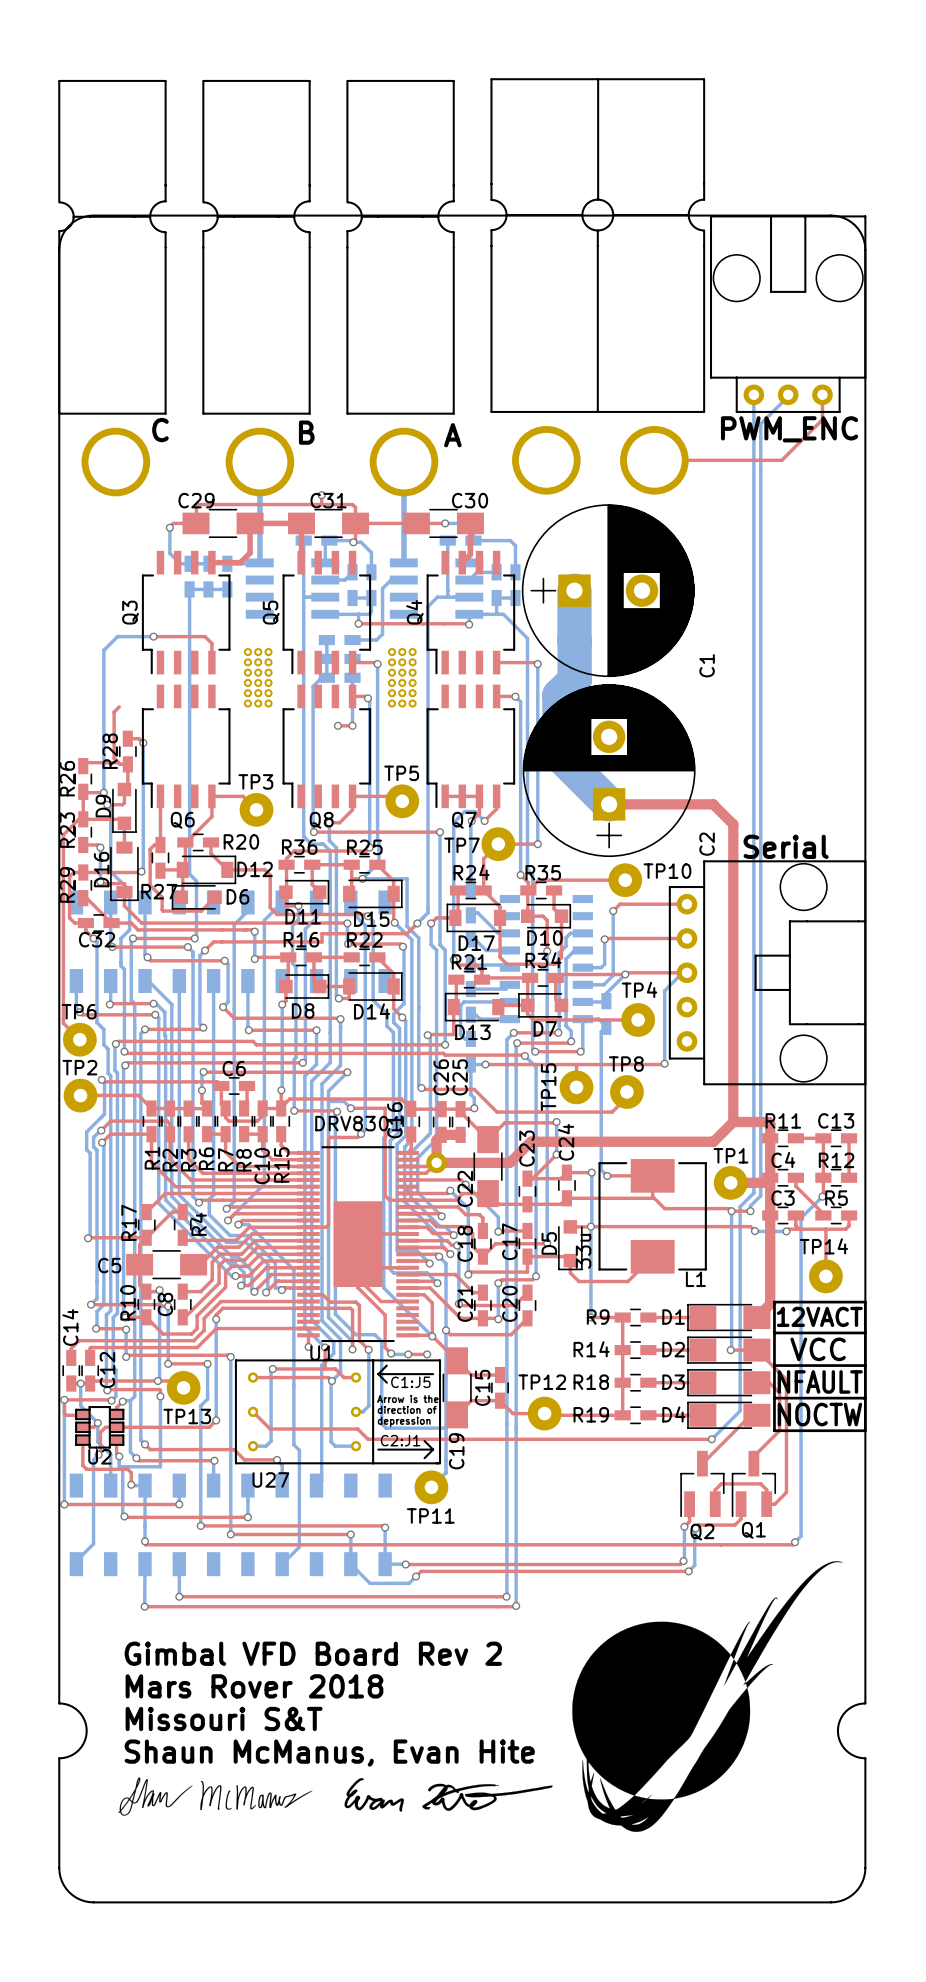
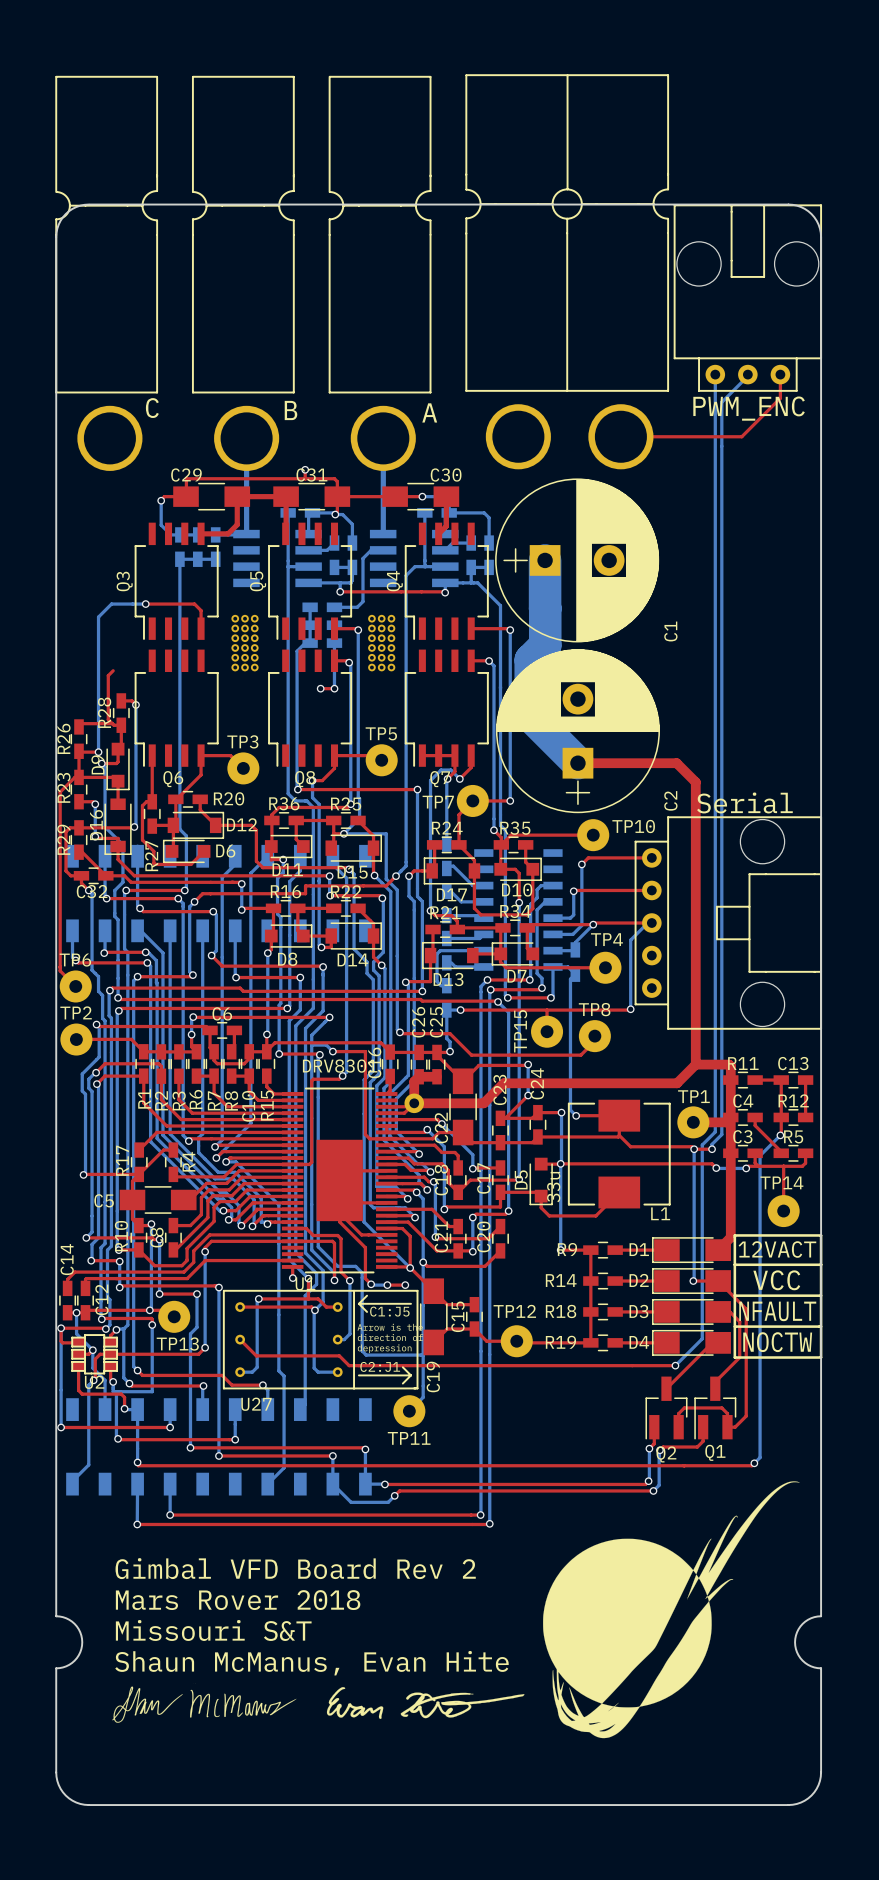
R27 name rotation: 0° (159, 891) -> 90° counterclockwise (151, 856)

